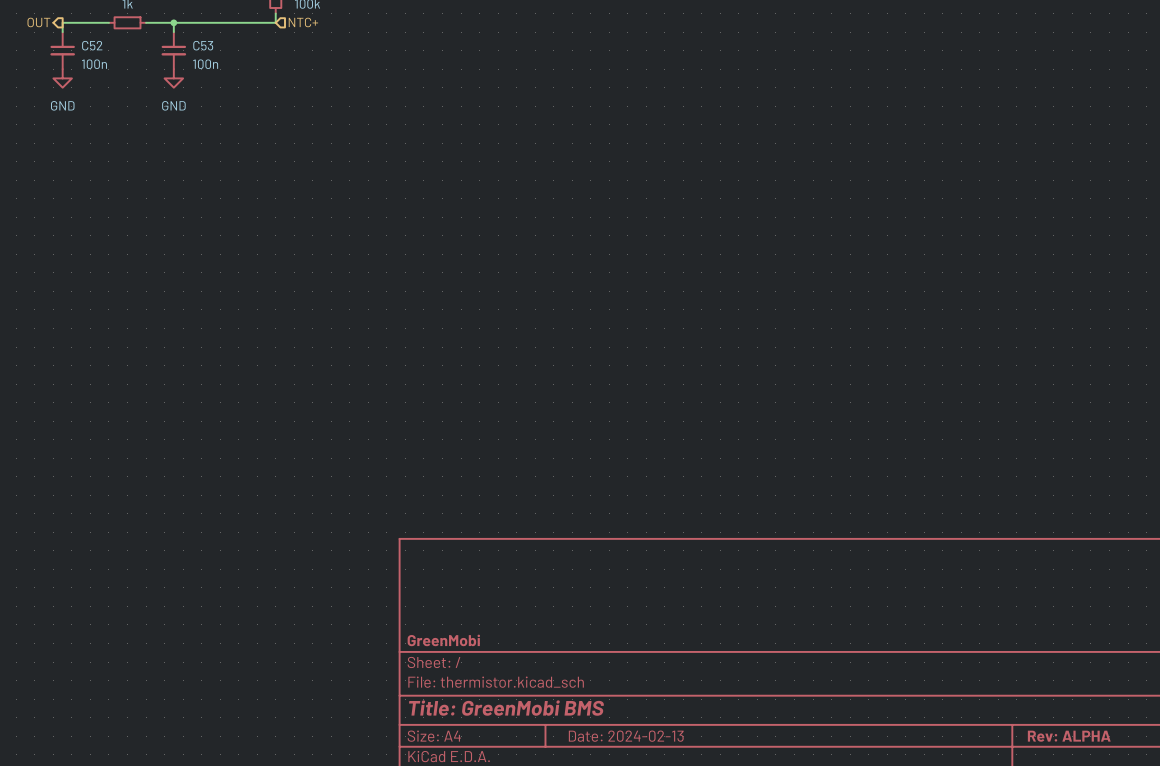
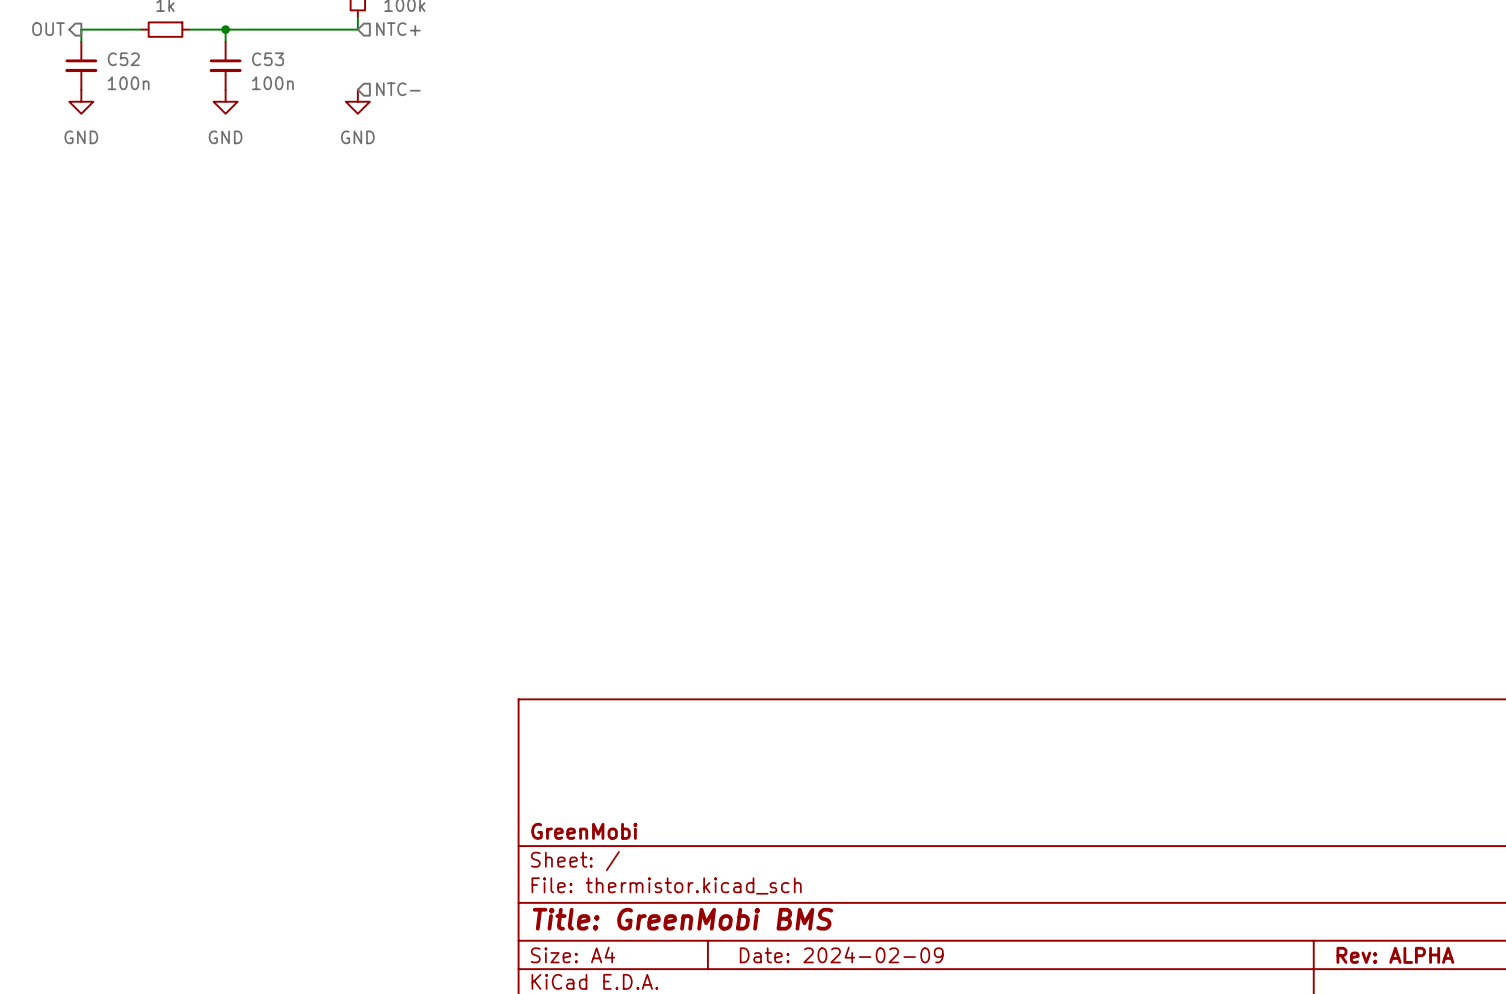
hierarchical label: none -> NTC- (398, 89)
power symbol: none -> GND (357, 101)
title block: Date: 2024-02-13 (626, 736) -> Date: 2024-02-09 (841, 955)

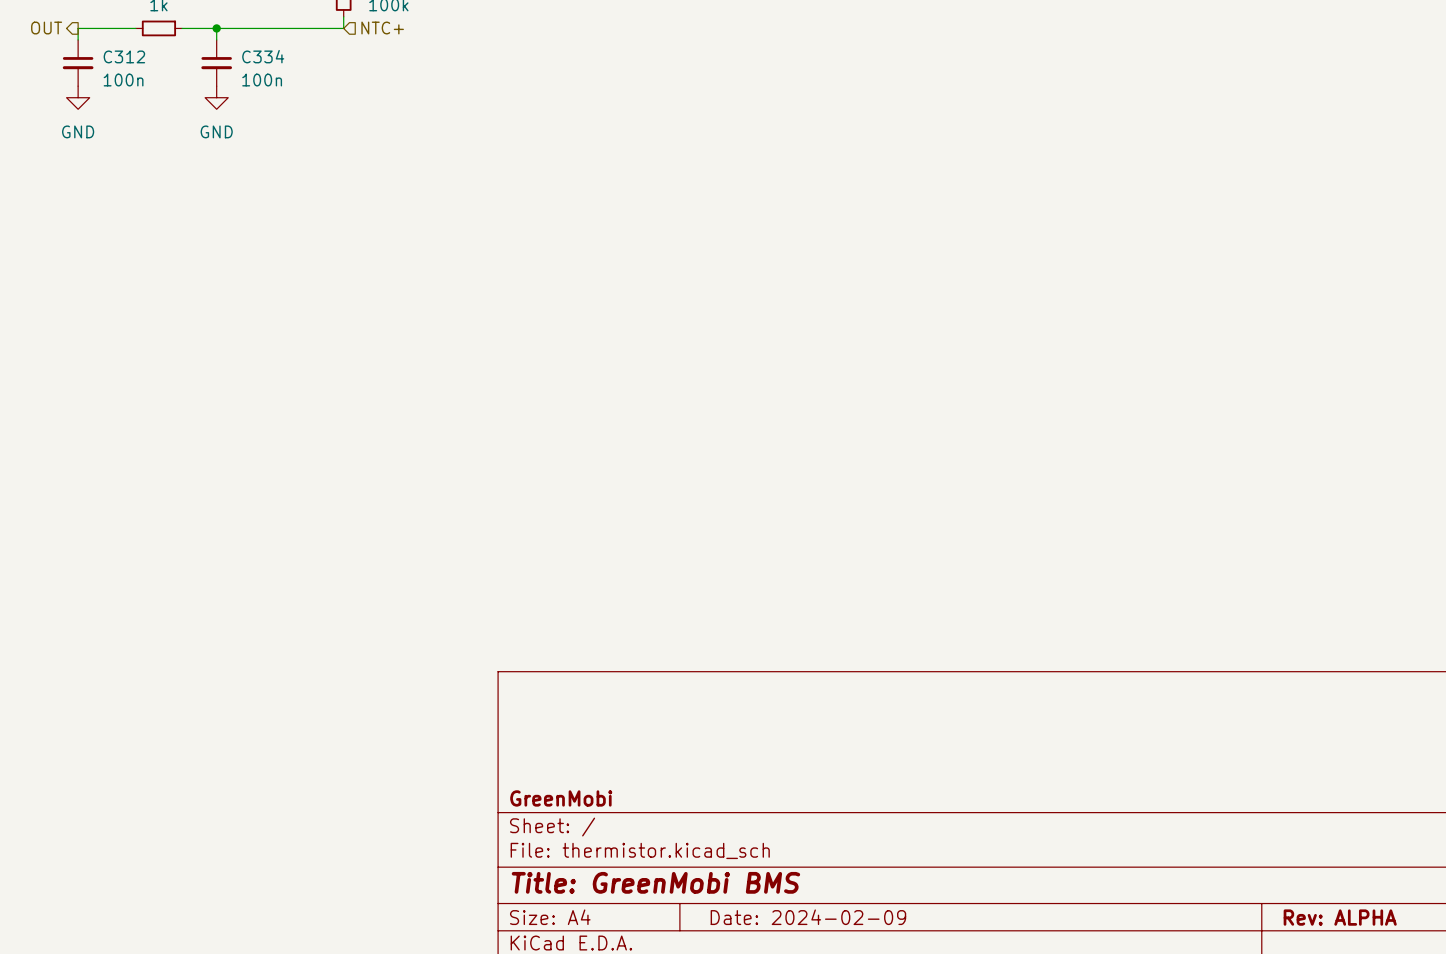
C52 name: C52 (123, 59) -> C312 (124, 56)
C53 name: C53 (268, 59) -> C334 (263, 56)
hierarchical label: NTC- (398, 89) -> none
power symbol: GND (357, 101) -> none

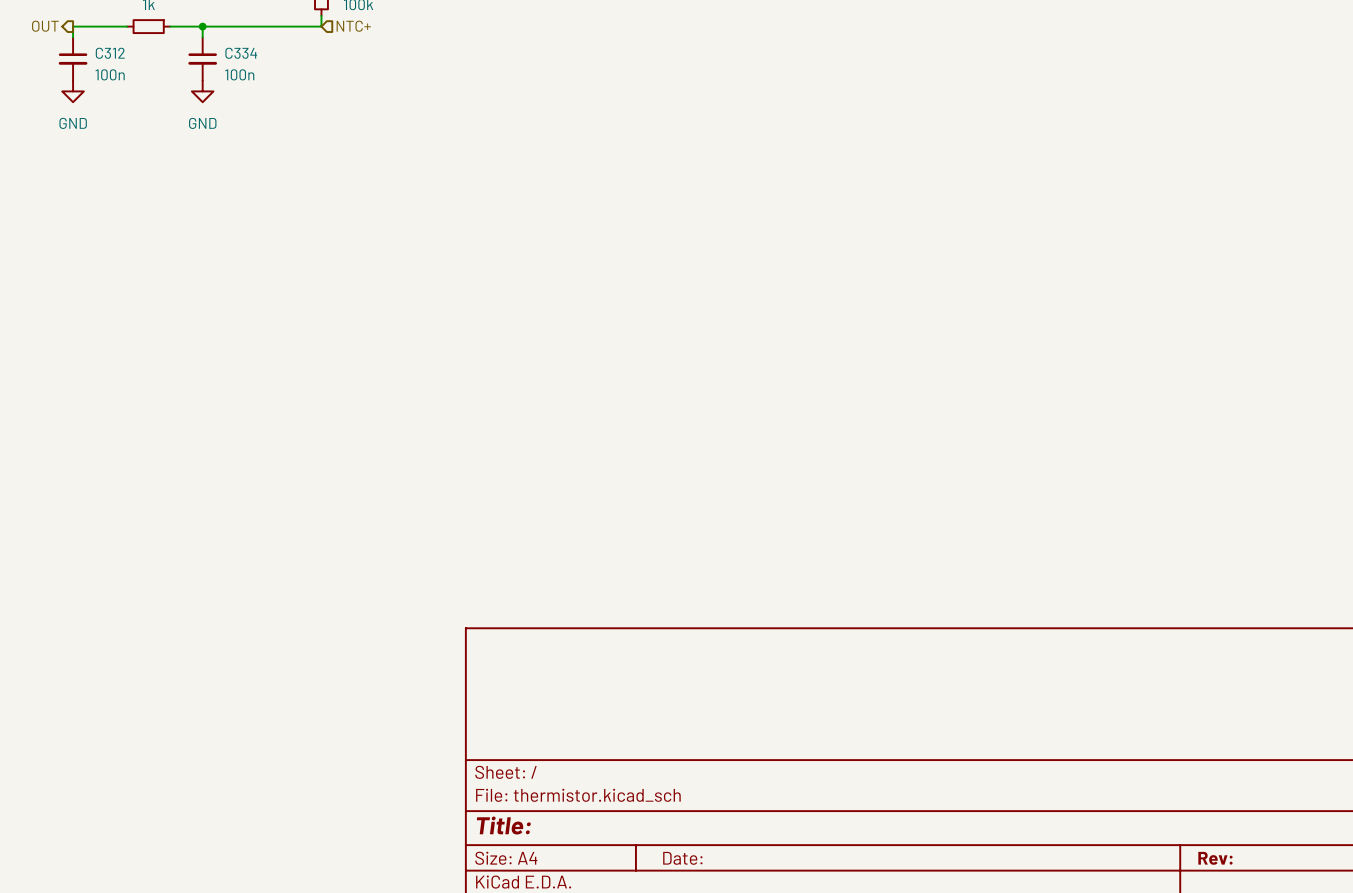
title block: GreenMobi (561, 798) -> none
title block: Title: GreenMobi BMS (655, 882) -> Title: (503, 825)
title block: Date: 2024-02-09 (808, 917) -> Date: (682, 858)
title block: Rev: ALPHA (1340, 917) -> Rev: (1215, 858)

